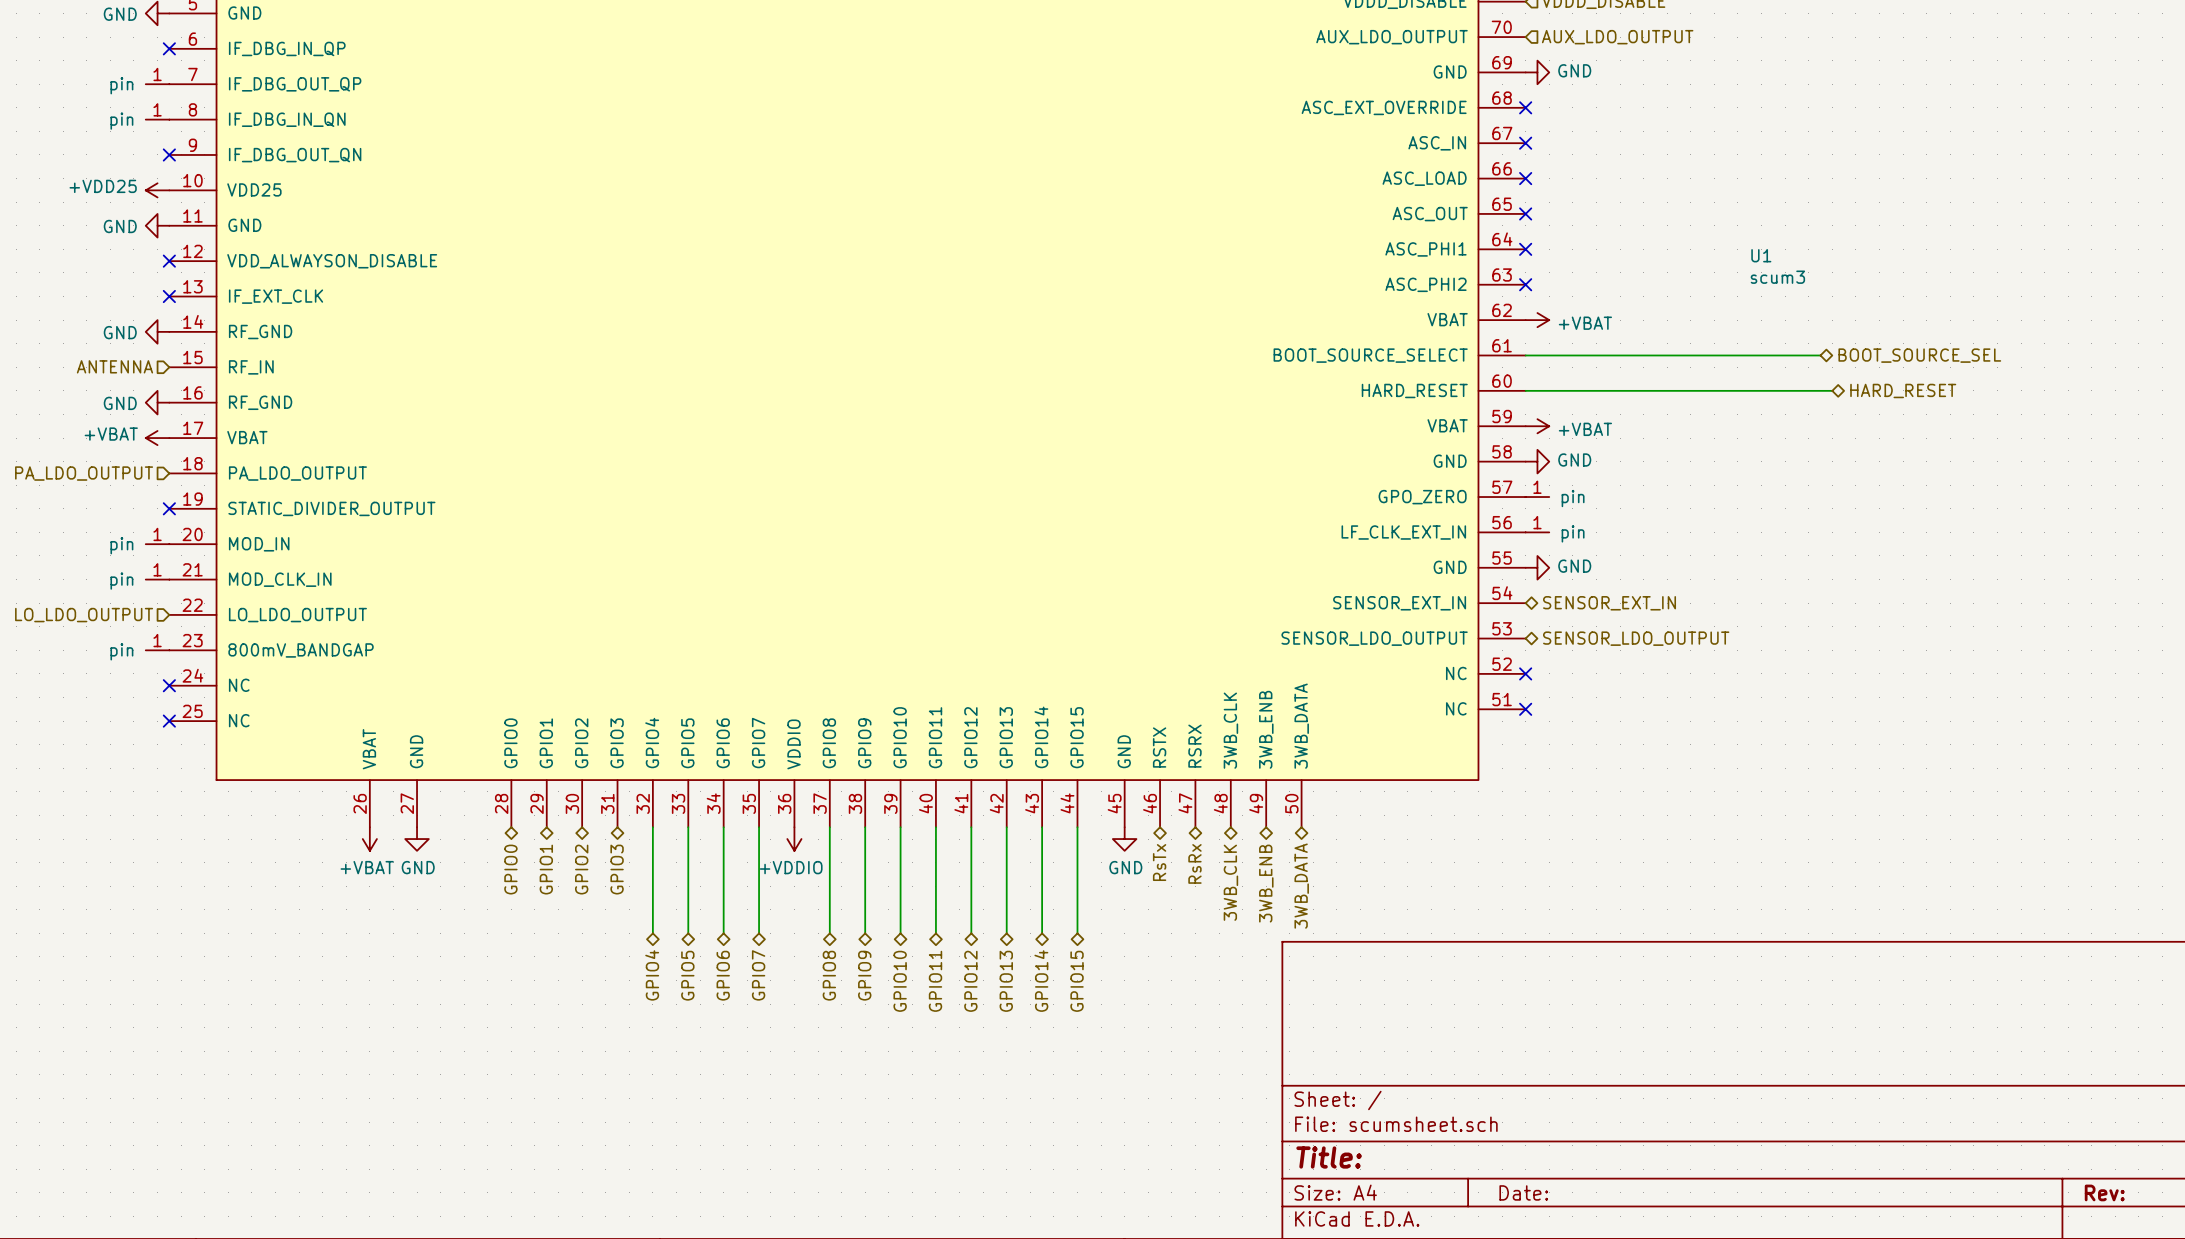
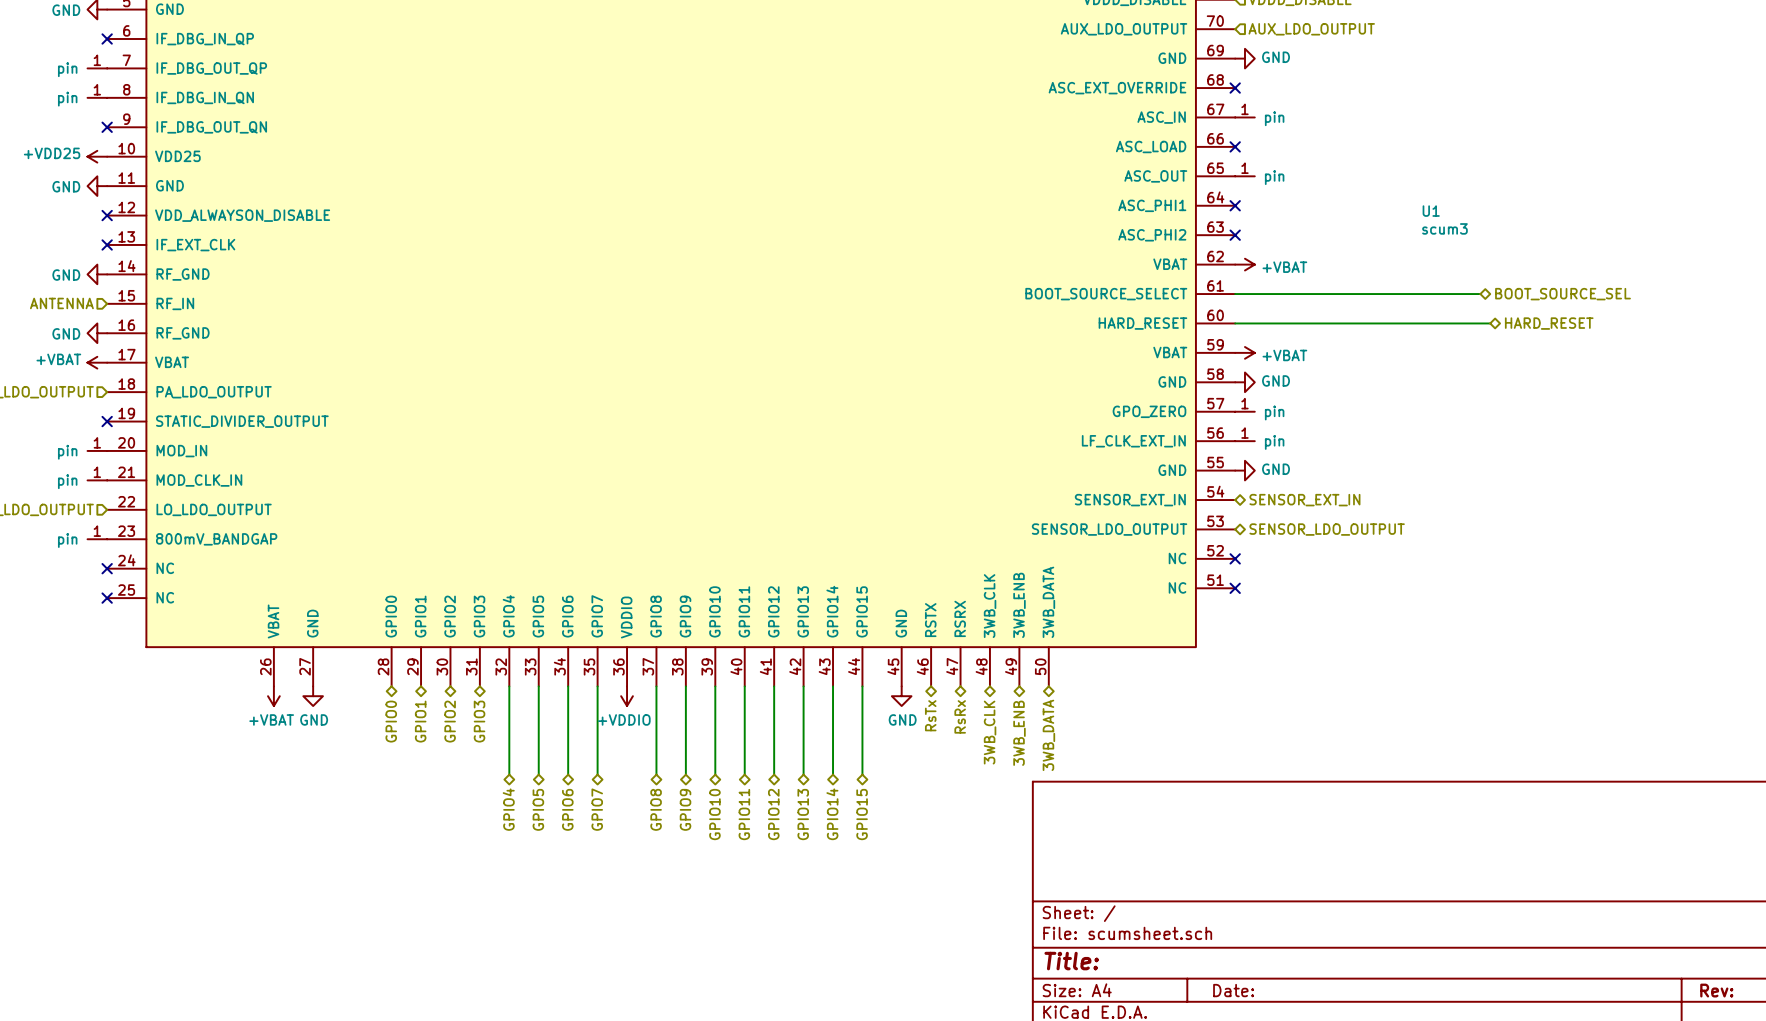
no-connect mark: (1525, 143) -> none
part: none -> (1244, 117)
no-connect mark: (1525, 213) -> none
part: none -> (1244, 176)

